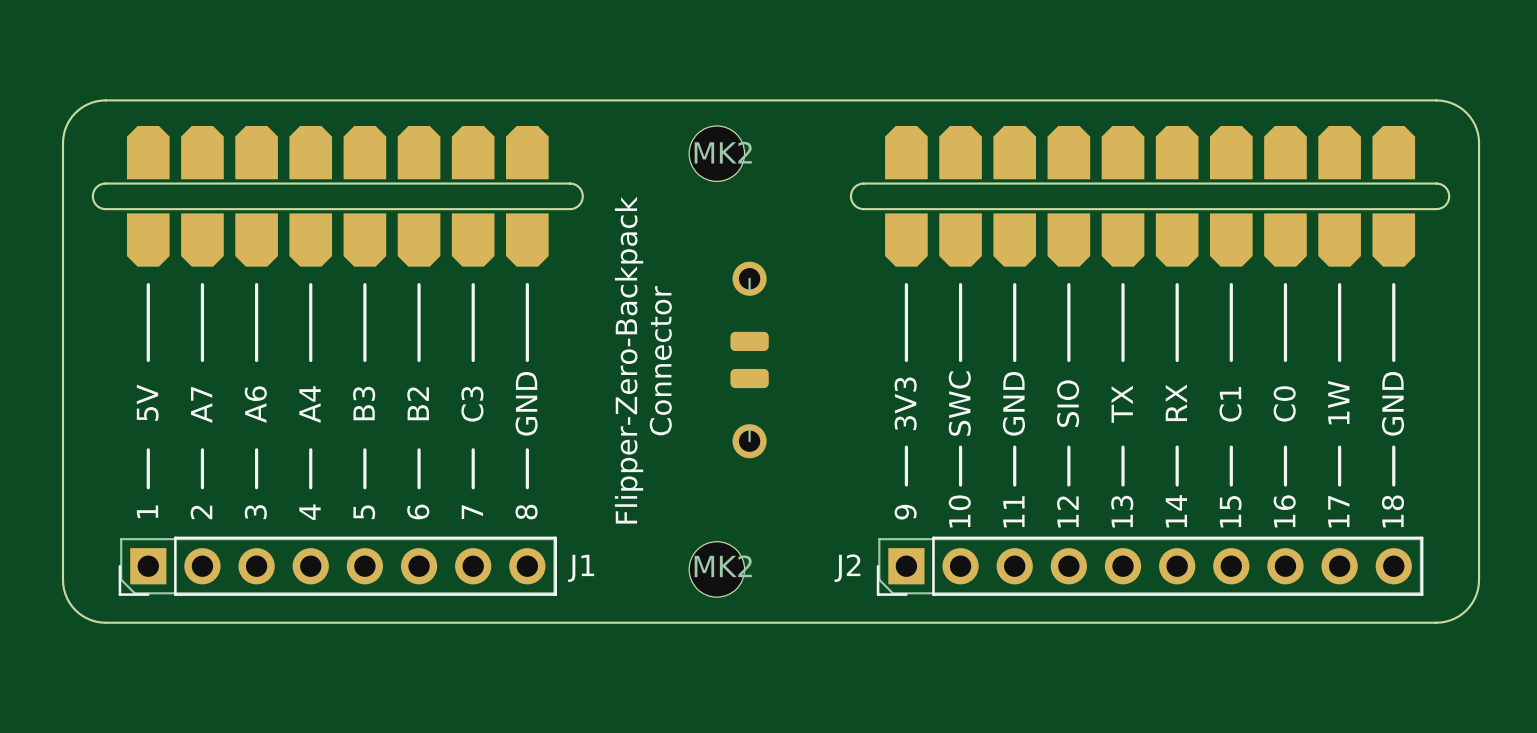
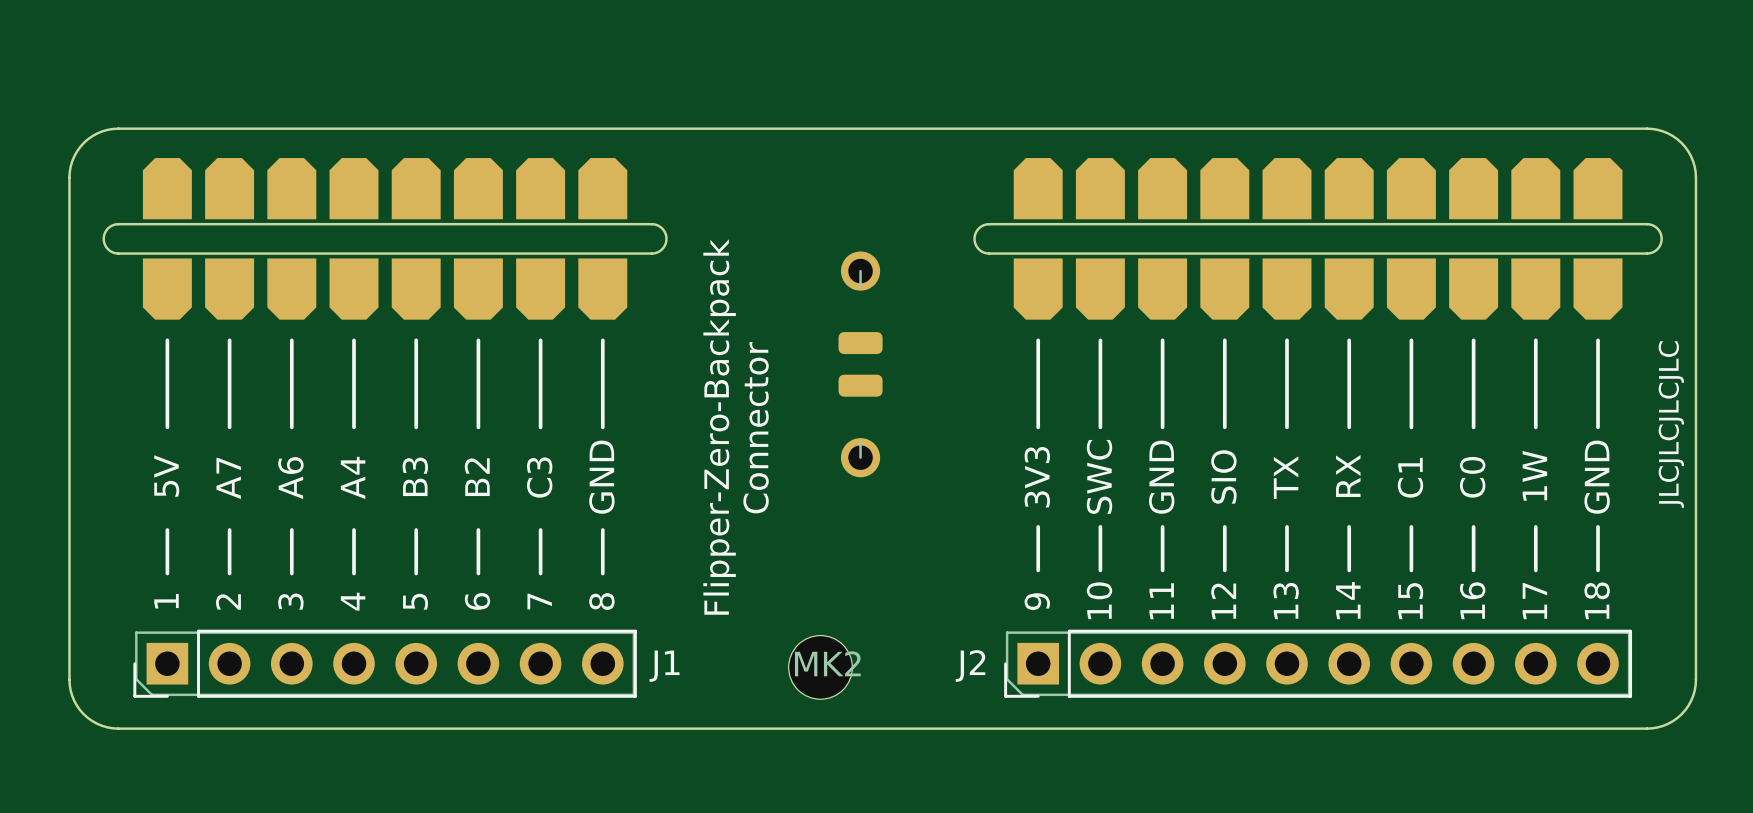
MK2: (716, 153) -> none
text: none -> JLCJLCJLCJLC (1671, 424)
part position: (749, 359) -> (860, 364)

